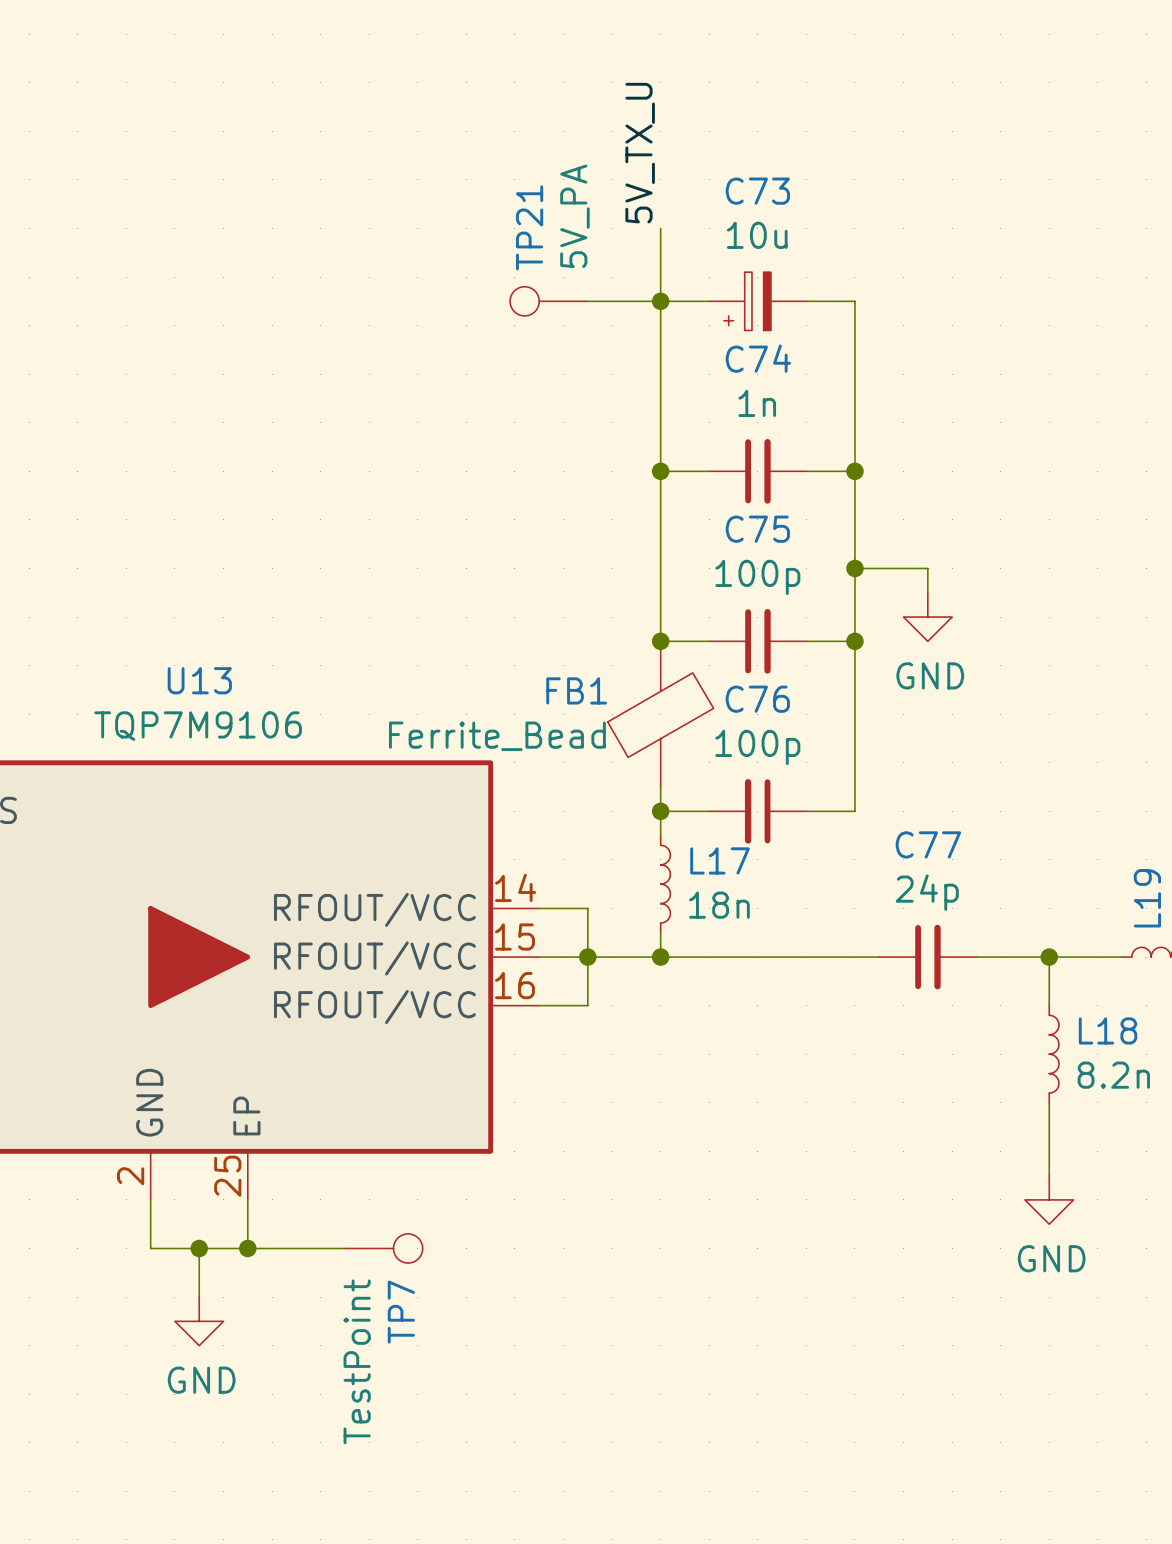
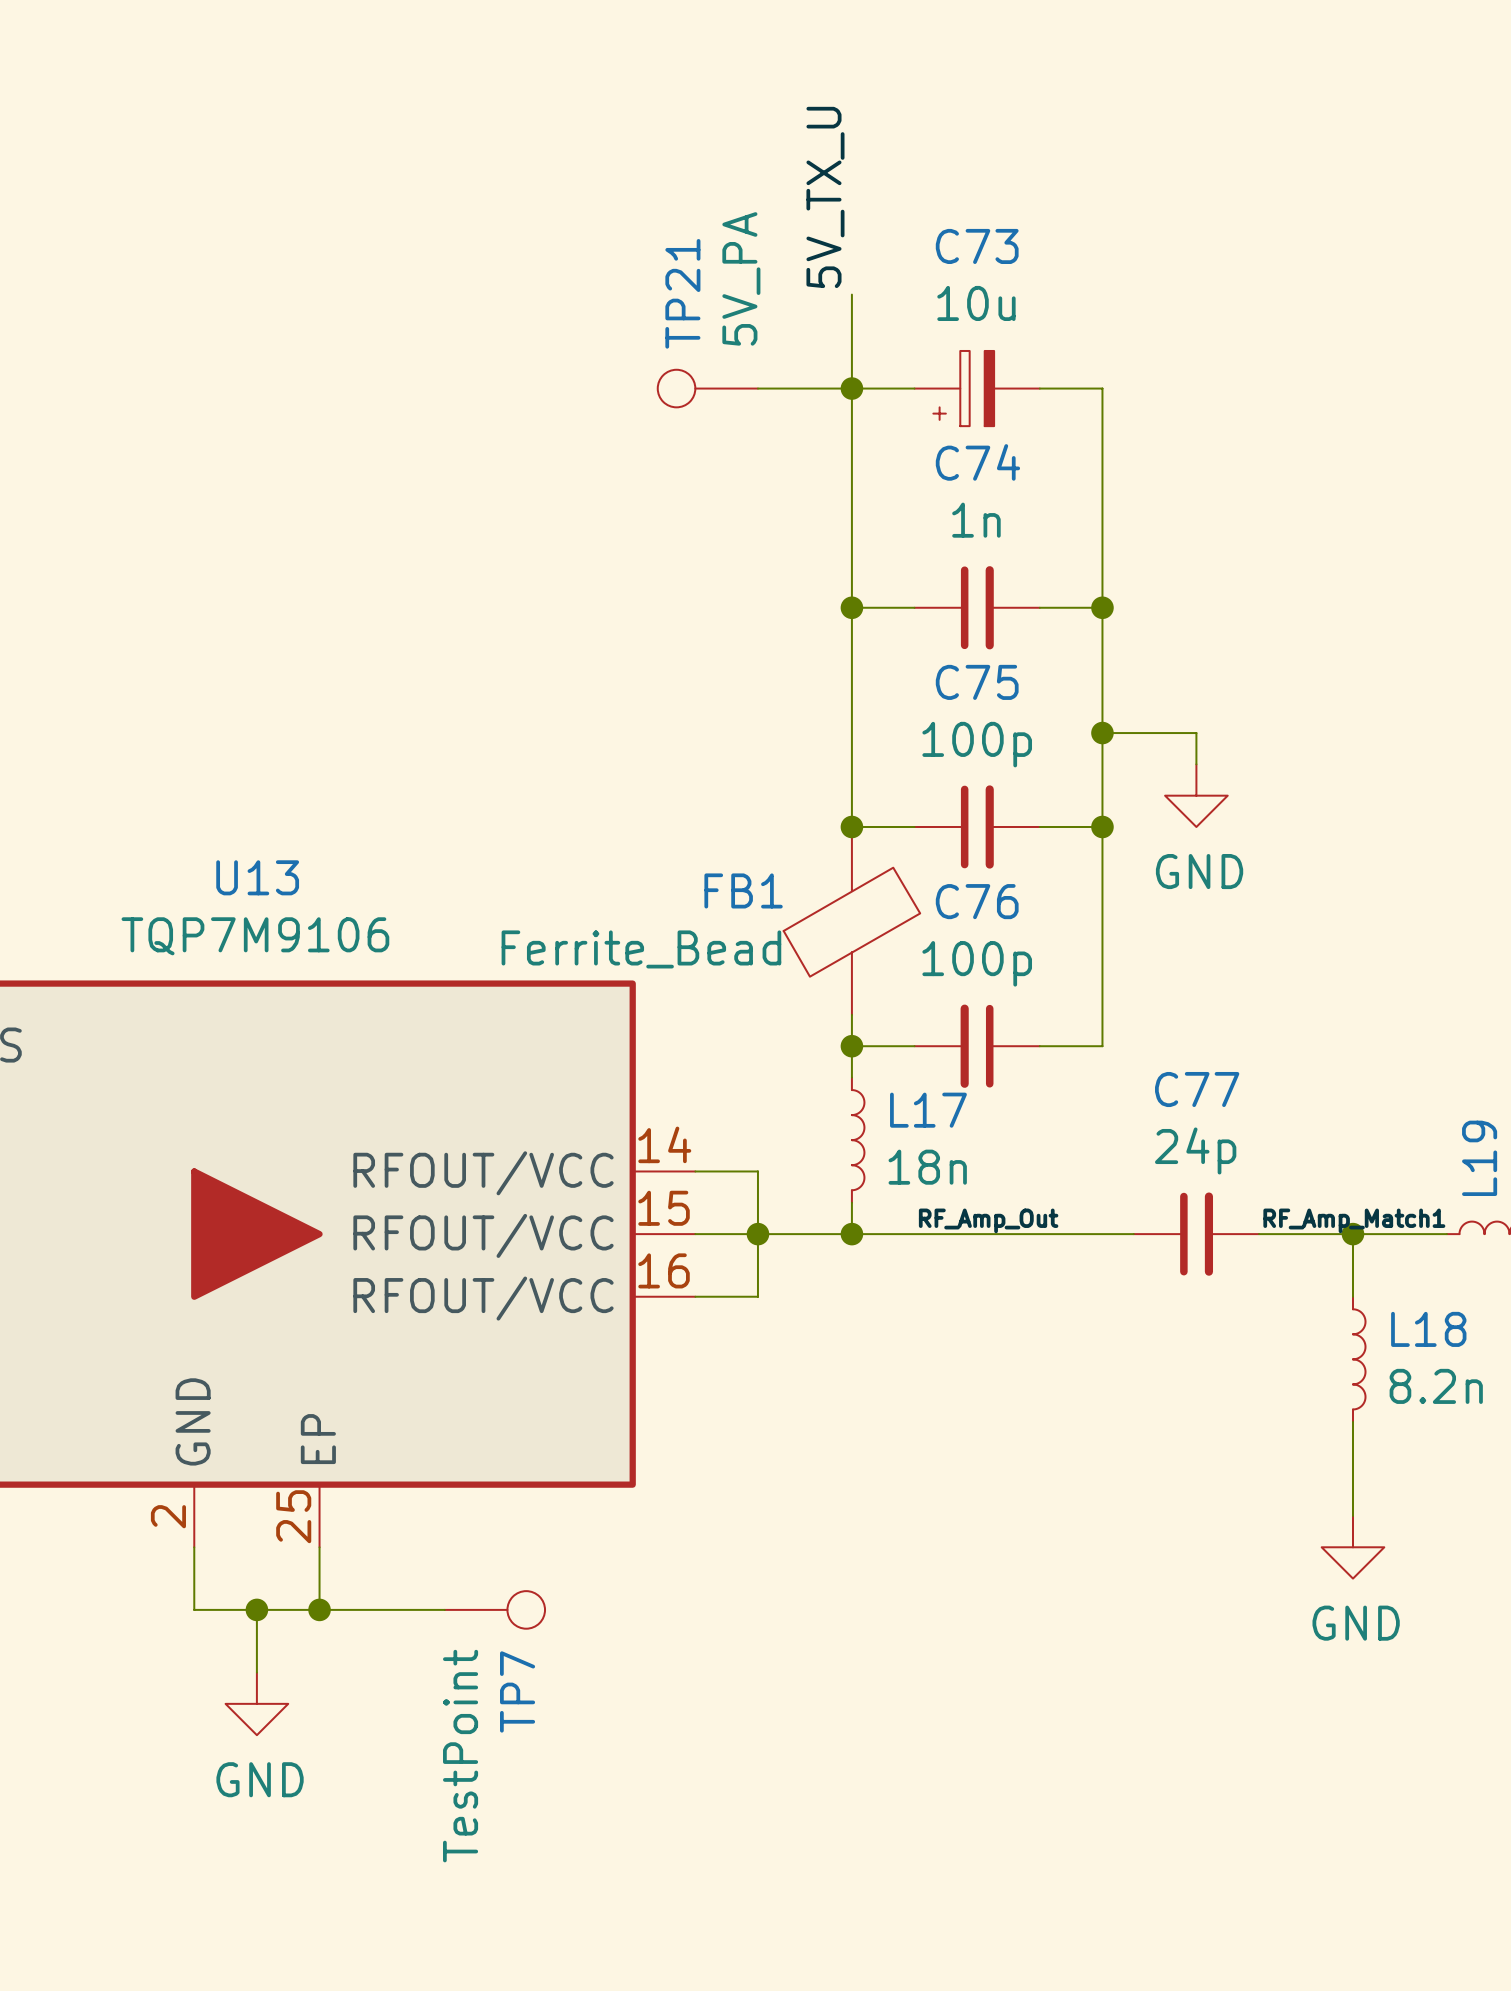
label: none -> RF_Amp_Out (988, 1220)
label: none -> RF_Amp_Match1 (1354, 1220)

